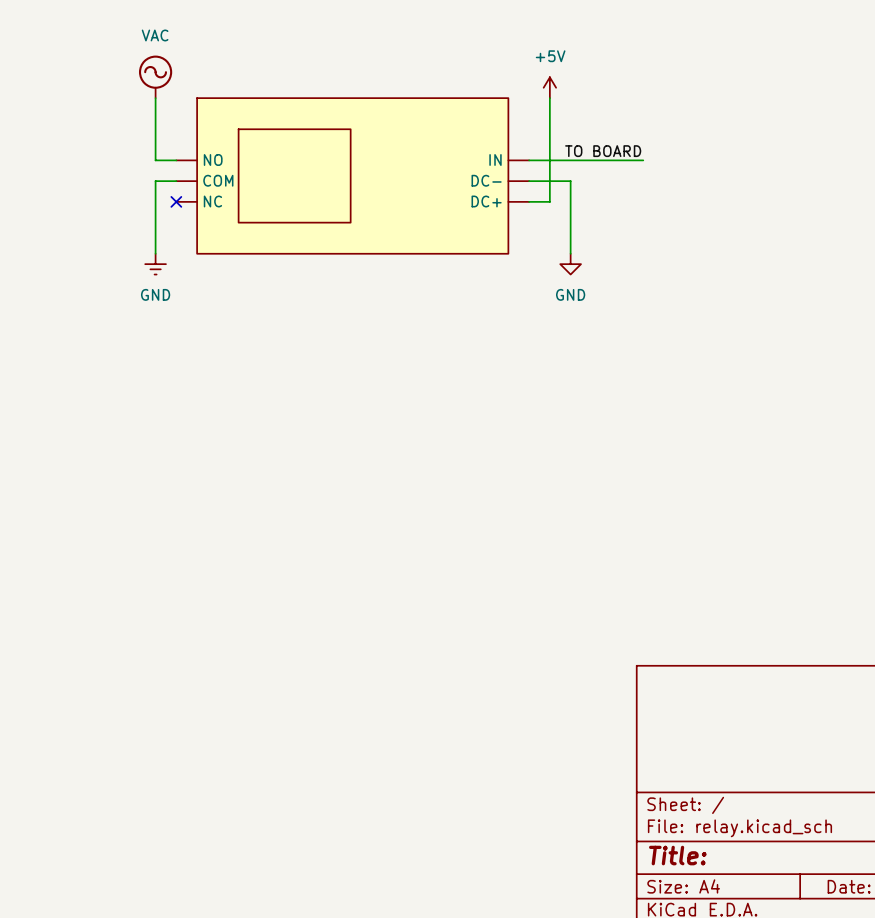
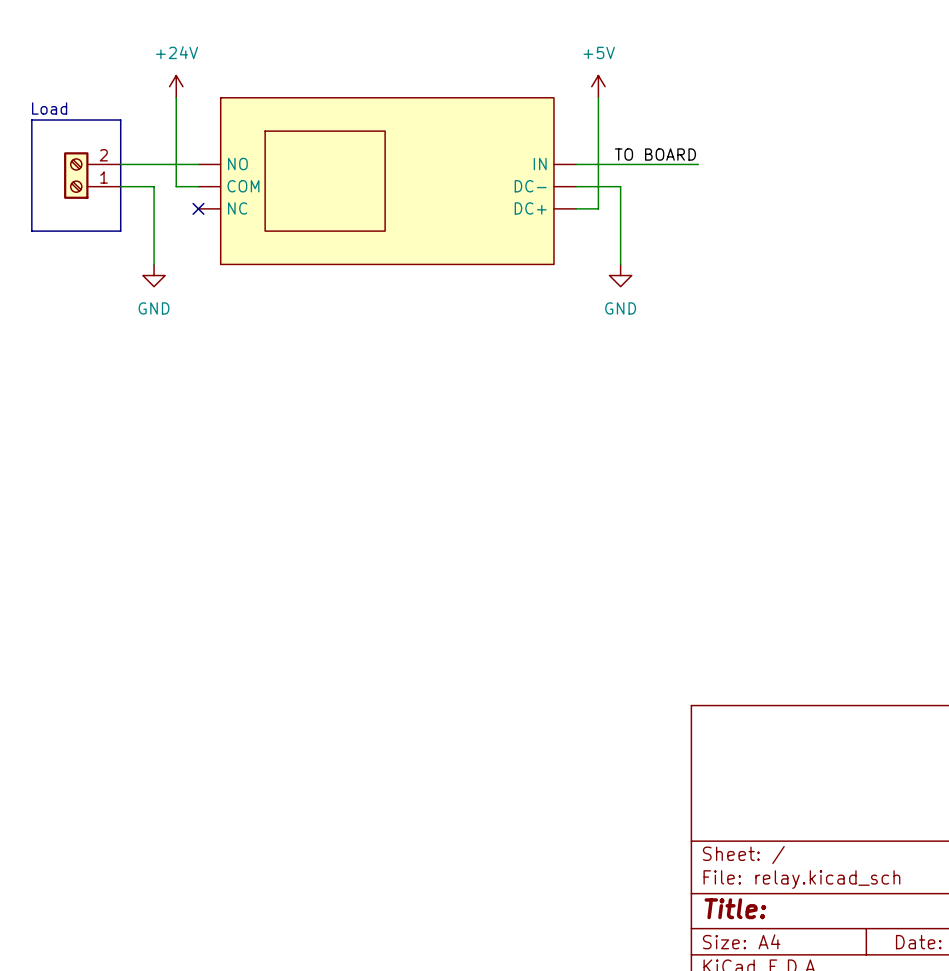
power symbol: VAC (155, 76) -> none
power symbol: none -> +24V (176, 86)
text: none -> Load (49, 108)
line: none -> (31, 120) (120, 120) (120, 231) (31, 231) (31, 120)
part: none -> (92, 175)
wire: none -> (120, 186) (154, 186) (154, 264)
wire: (155, 181) (155, 253) -> (176, 186) (176, 164) (120, 164)
power symbol: none -> GND (154, 275)
power symbol: GND (155, 264) -> none

